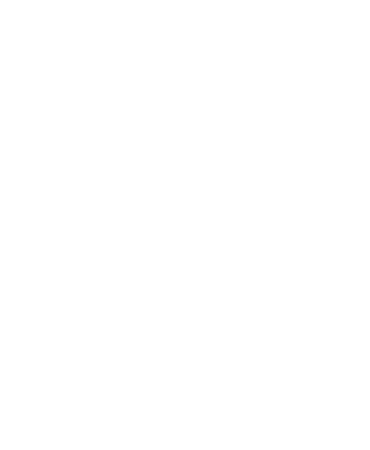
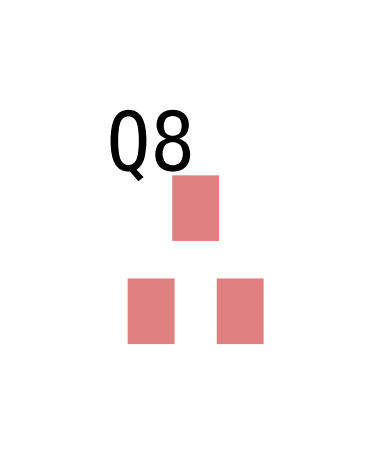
Q8: none -> (195, 259)

